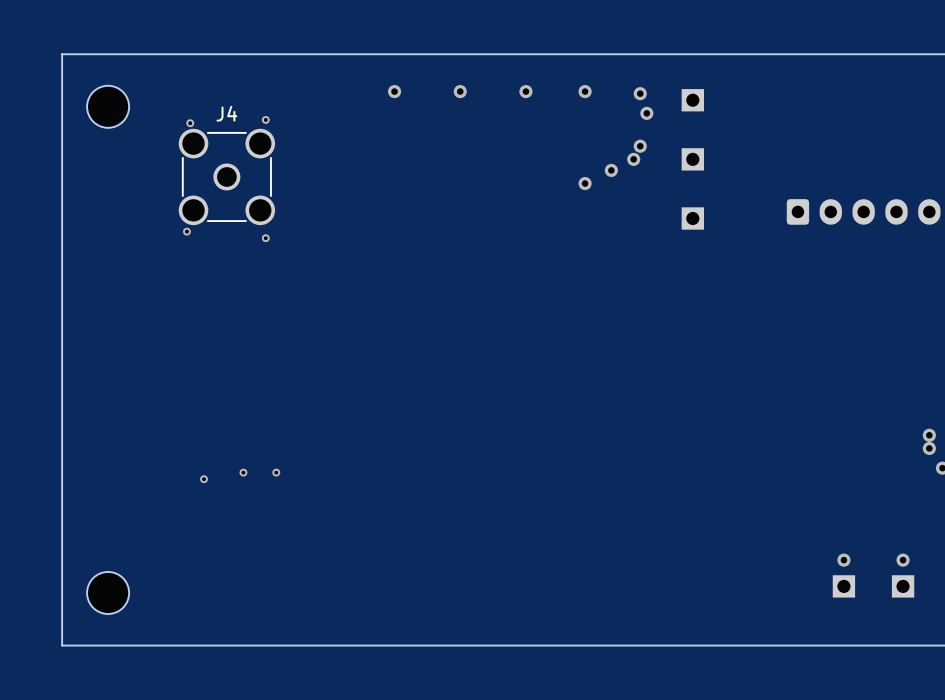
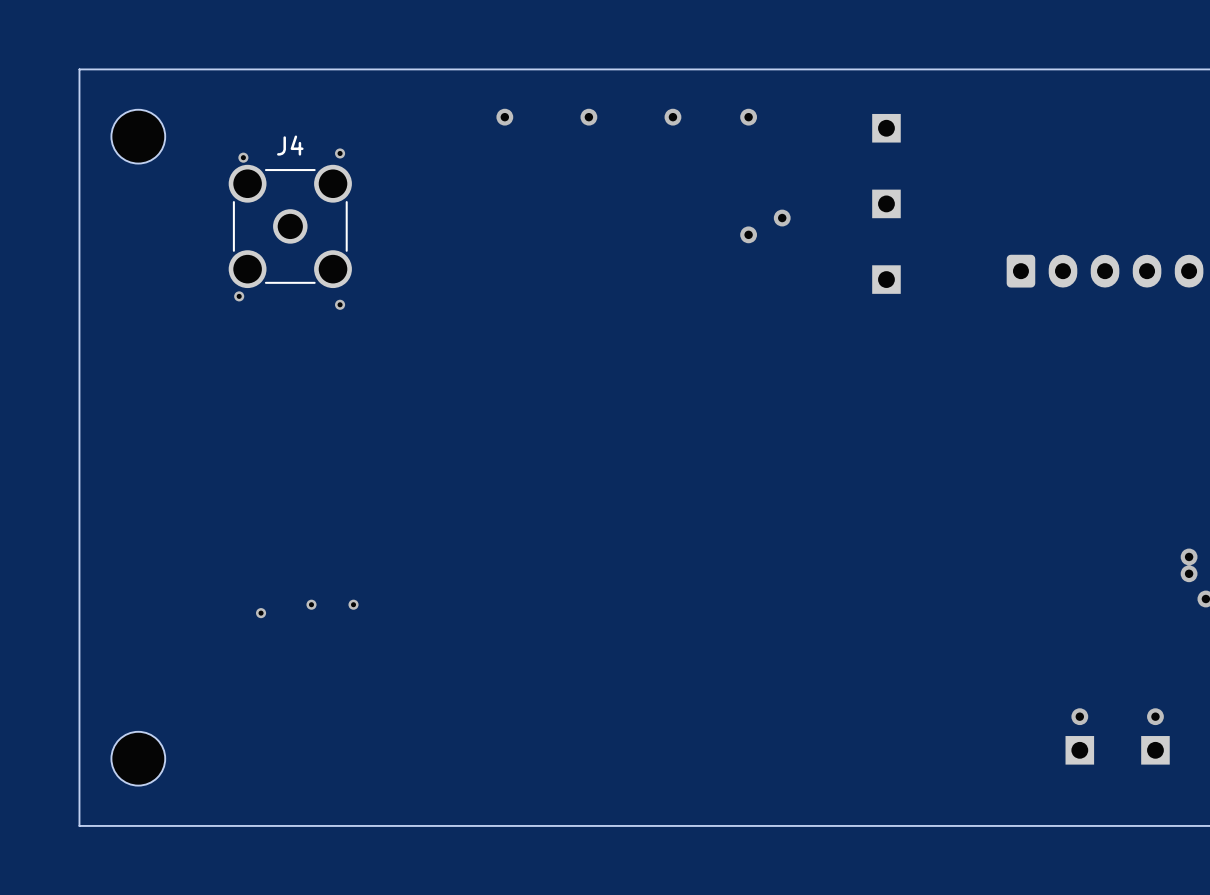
via: (640, 93) -> none
via: (646, 113) -> none
via: (640, 146) -> none
via: (633, 159) -> none

